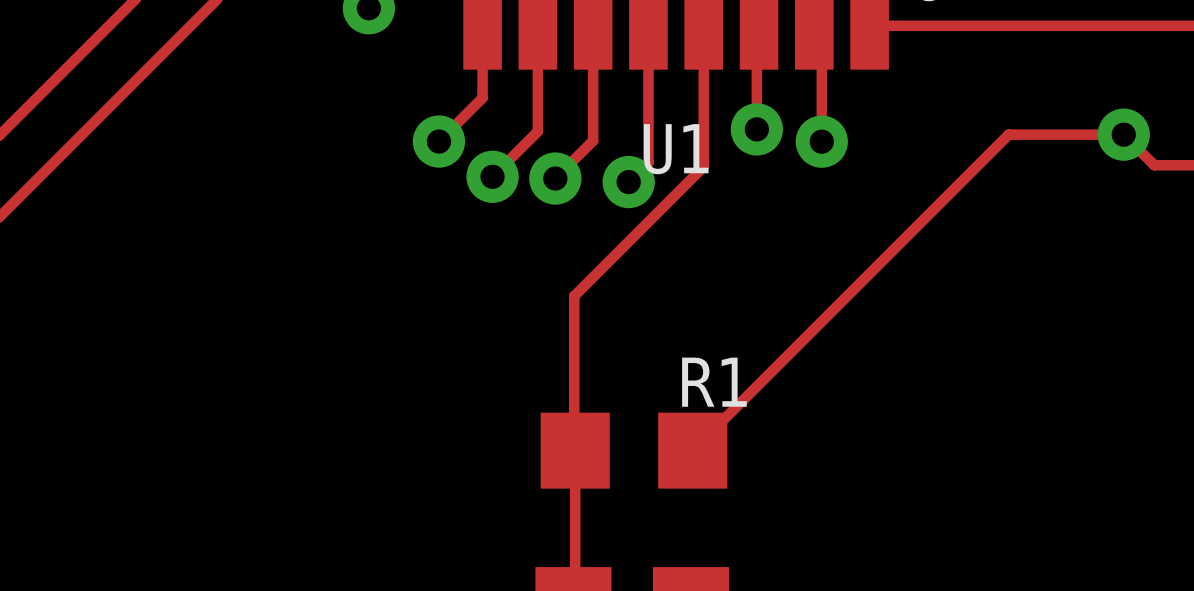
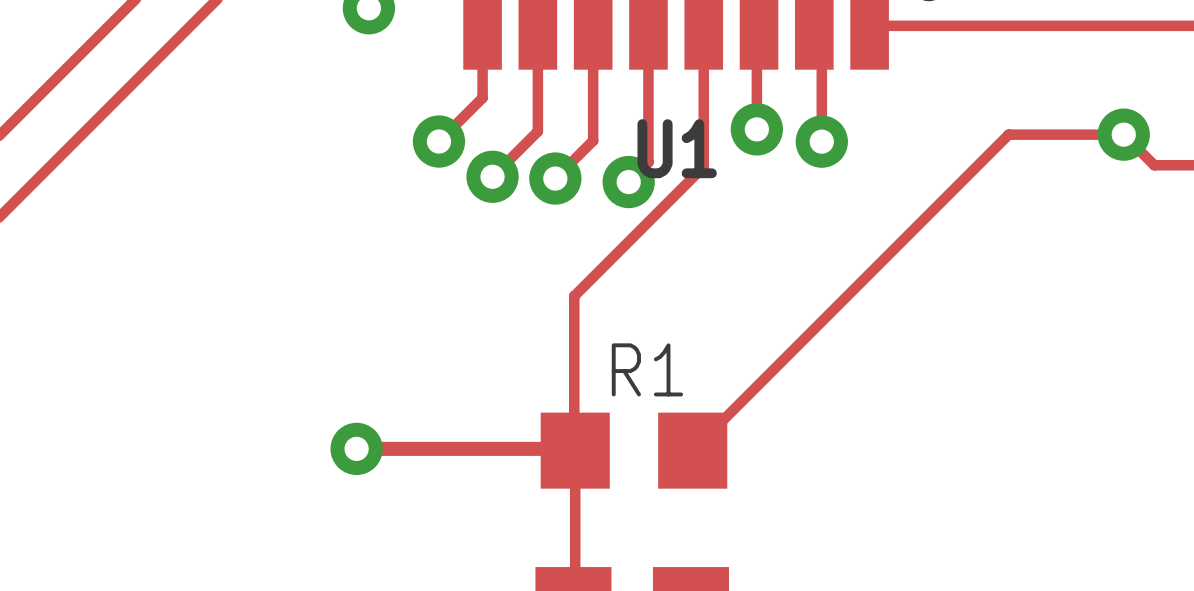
R1 name position: R1 (714, 382) -> R1 (647, 369)
track: none -> (356, 448) (573, 448) (575, 450)
via: none -> (356, 448)

